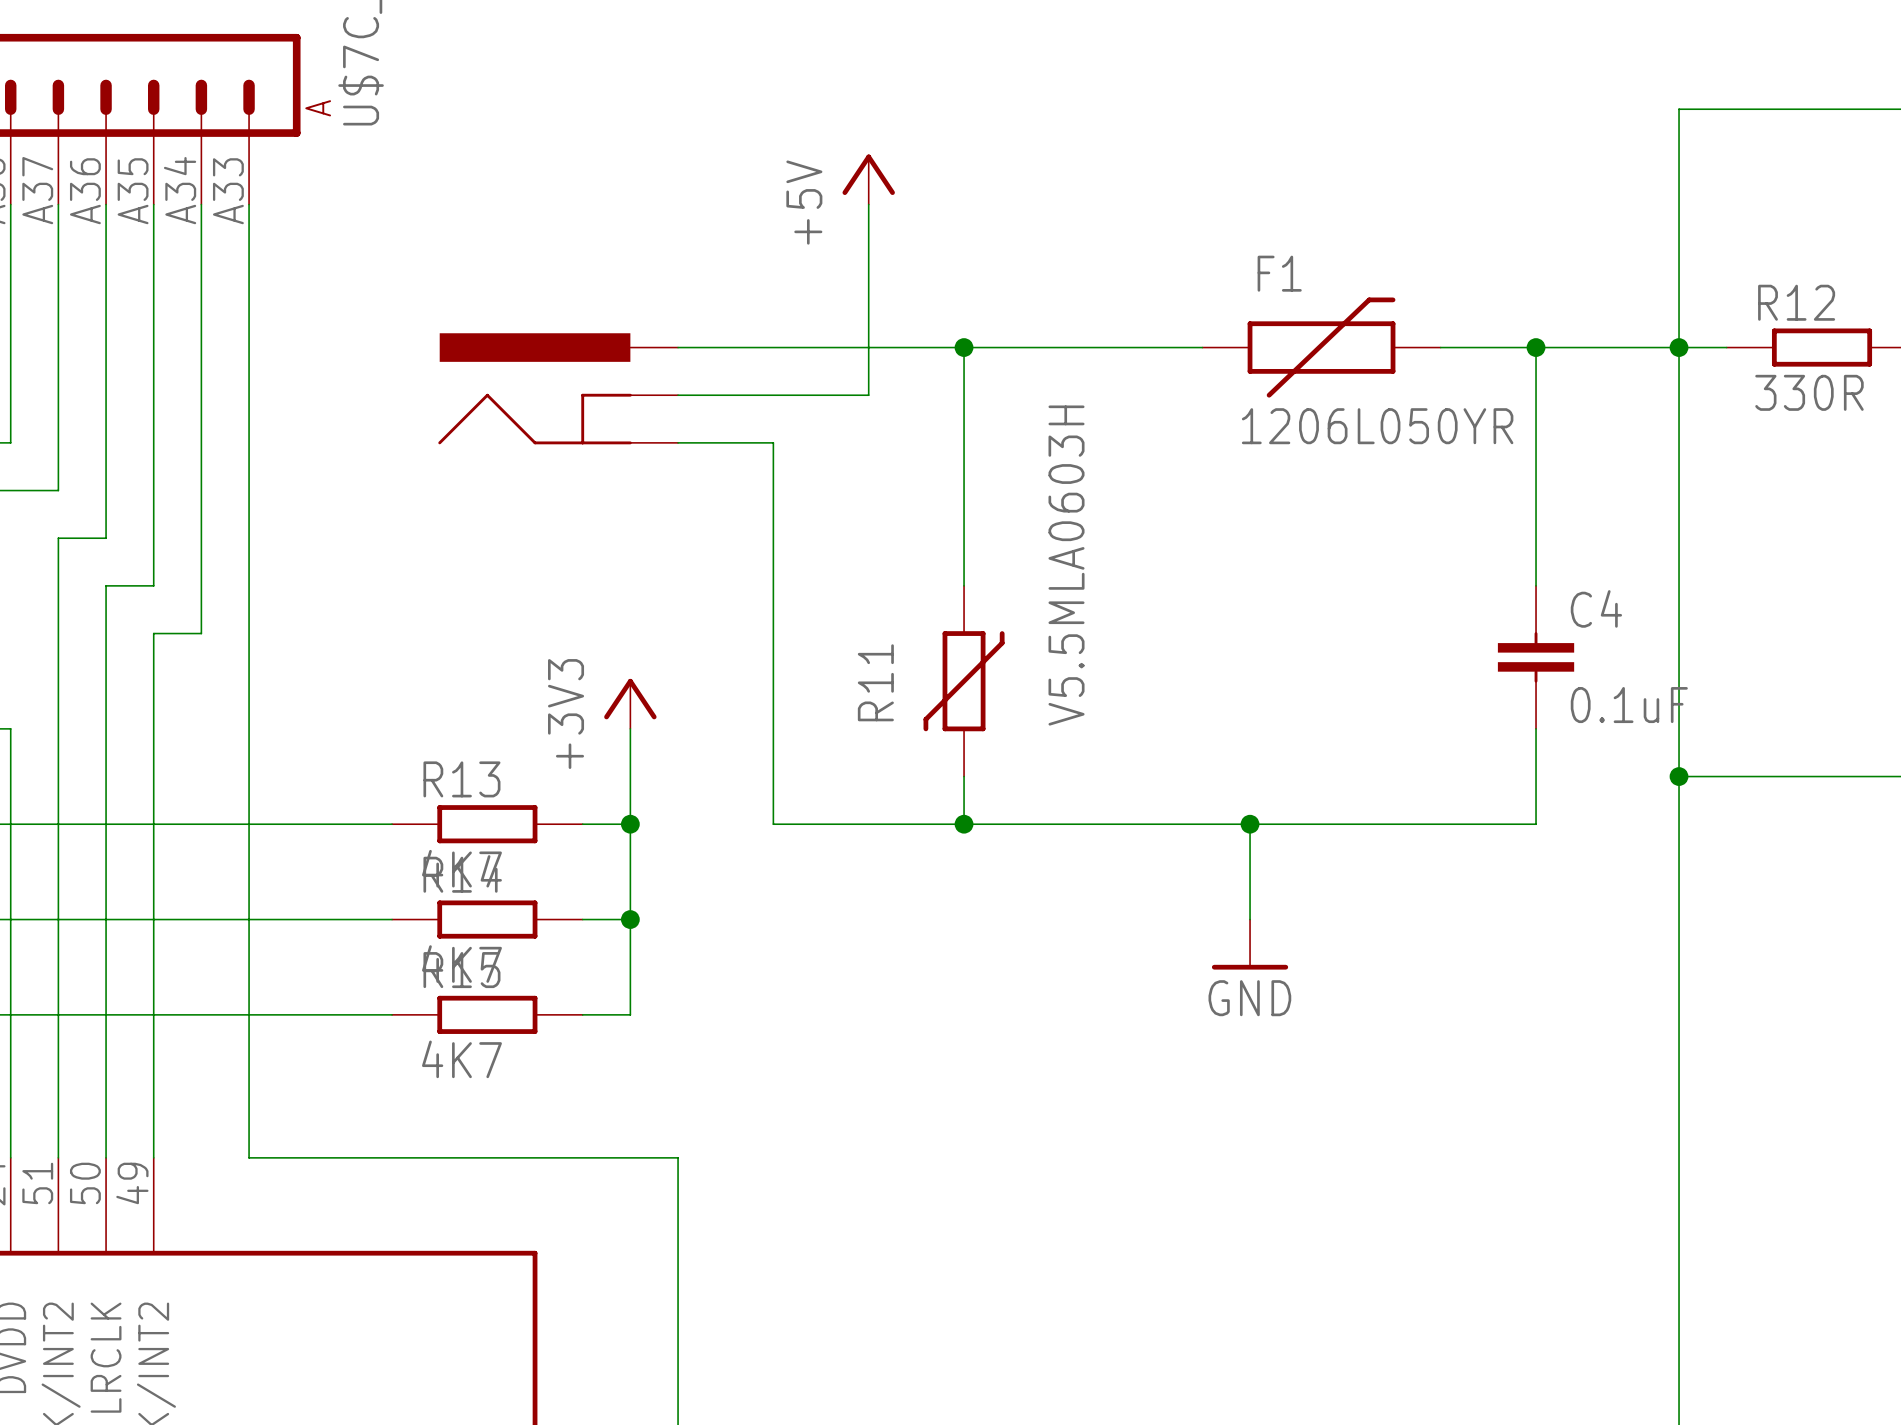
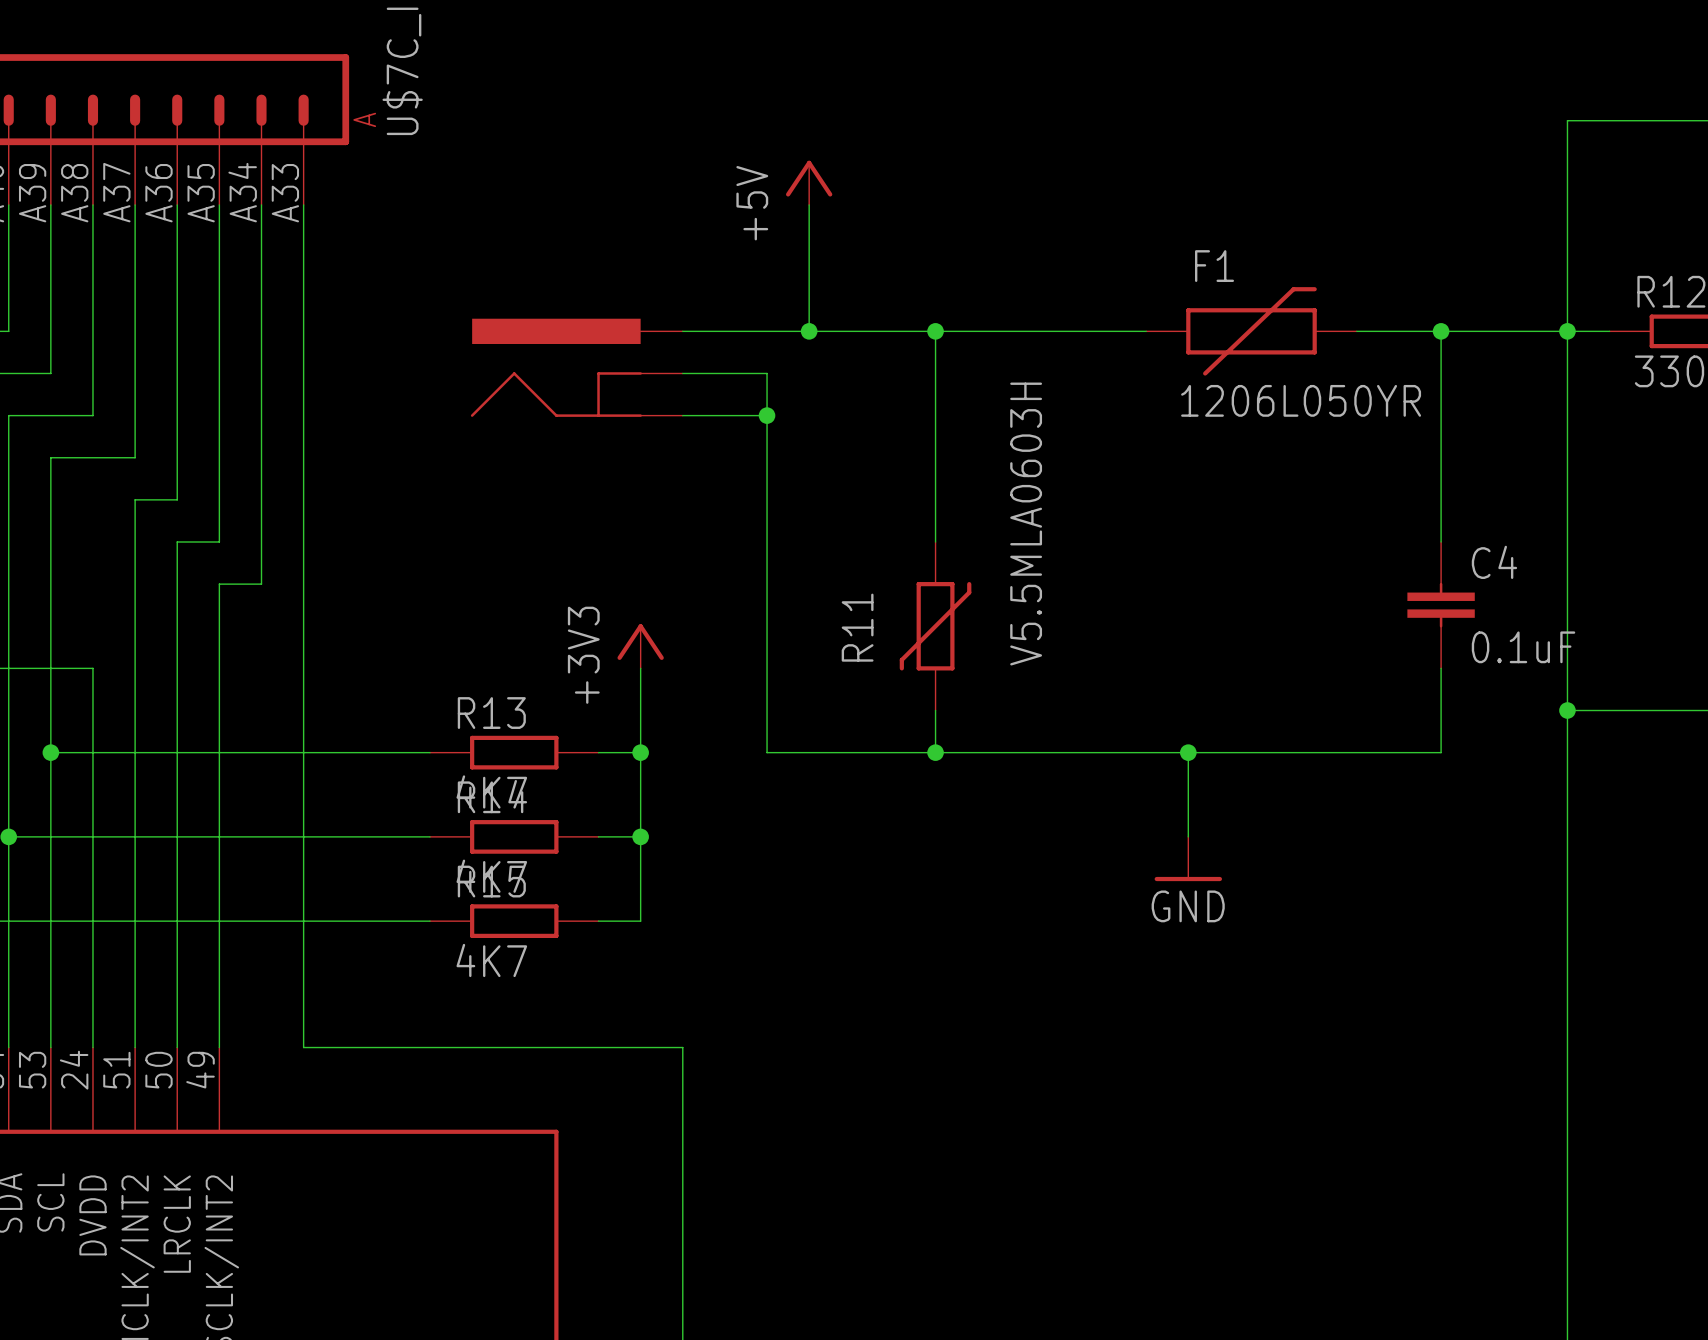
power symbol position: +5V (868, 179) -> +5V (809, 182)
wire: none -> (809, 204) (809, 331)
wire: (868, 204) (868, 395) (773, 395) -> (767, 415) (767, 373)
junction: none -> (809, 331)
junction: none -> (767, 415)

